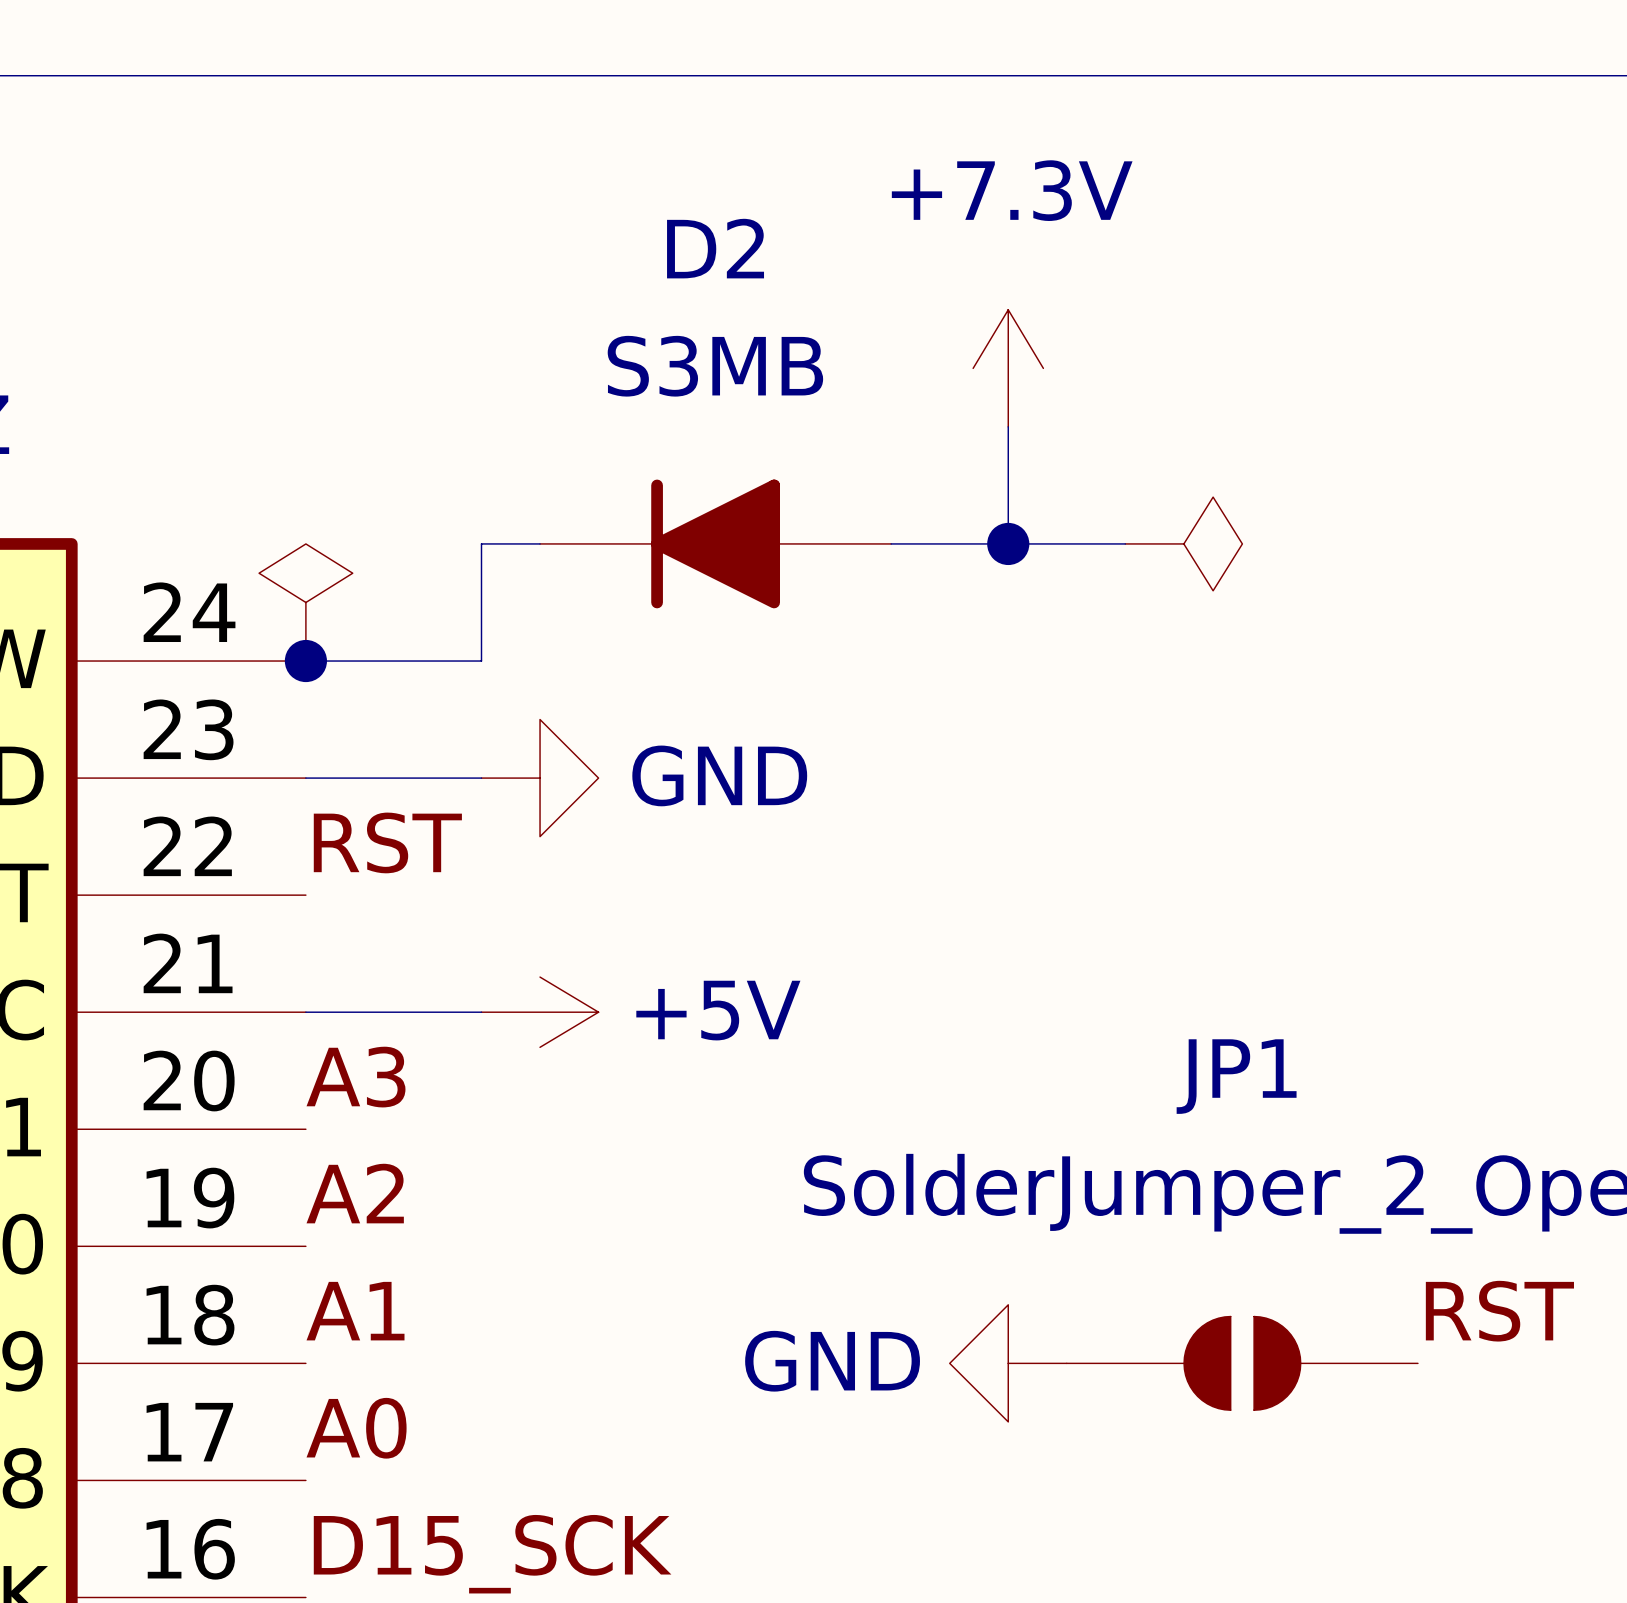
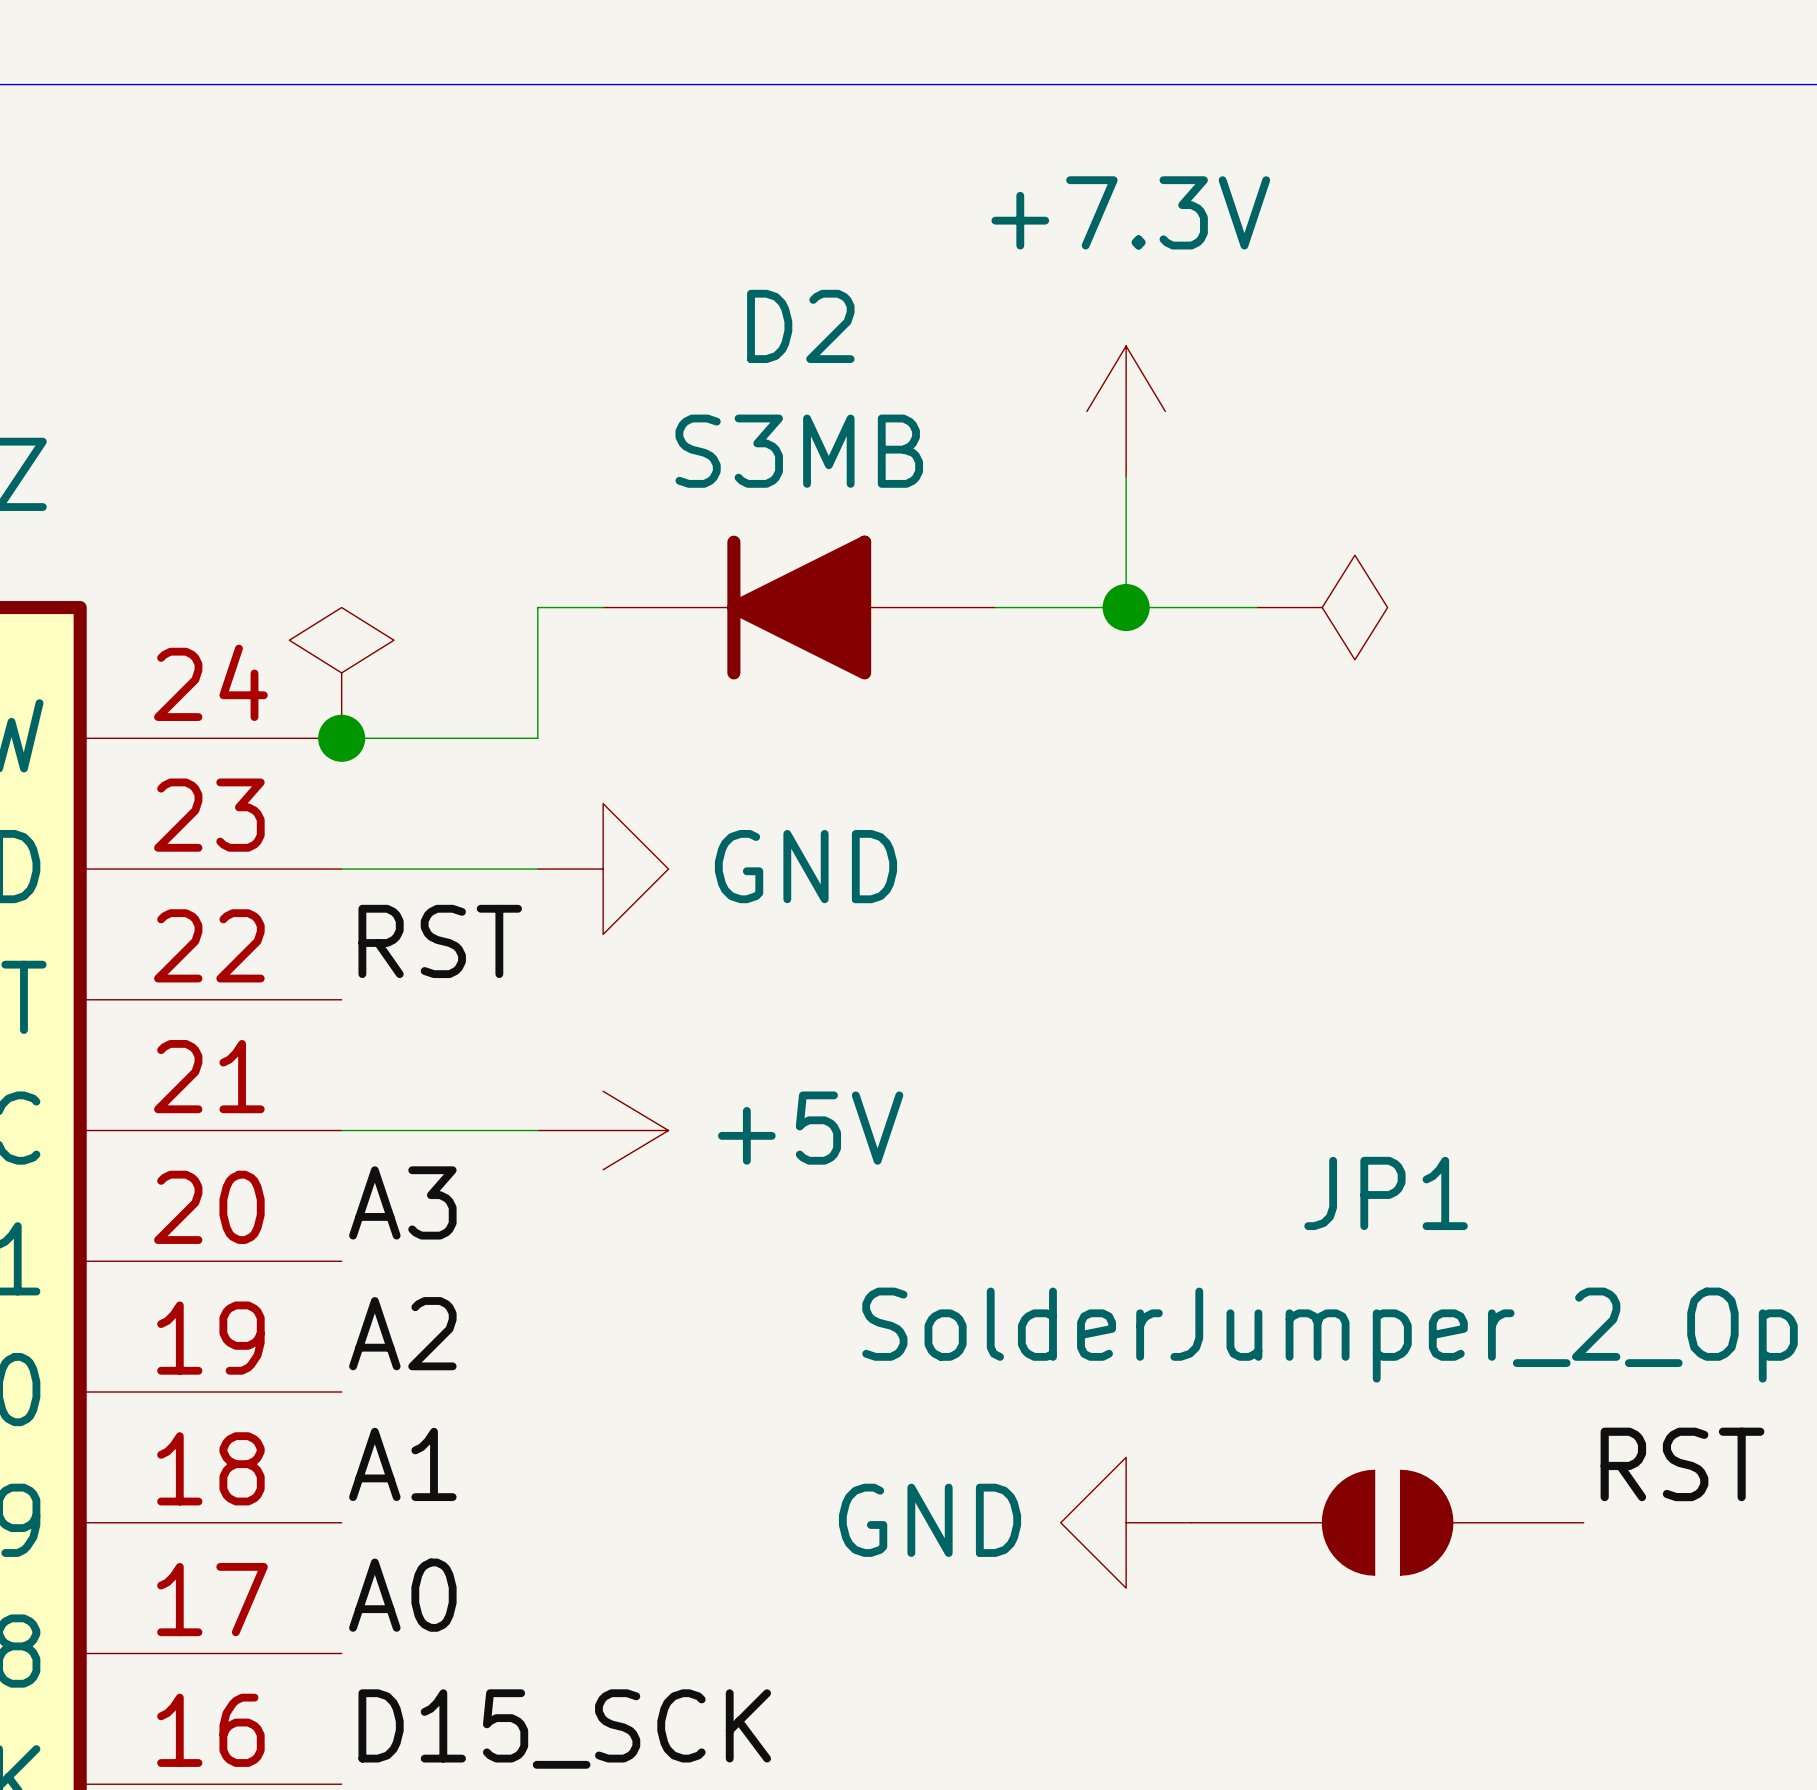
D2 name position: D2 (715, 248) -> D2 (800, 326)
D2 value position: S3MB (715, 366) -> S3MB (799, 451)

